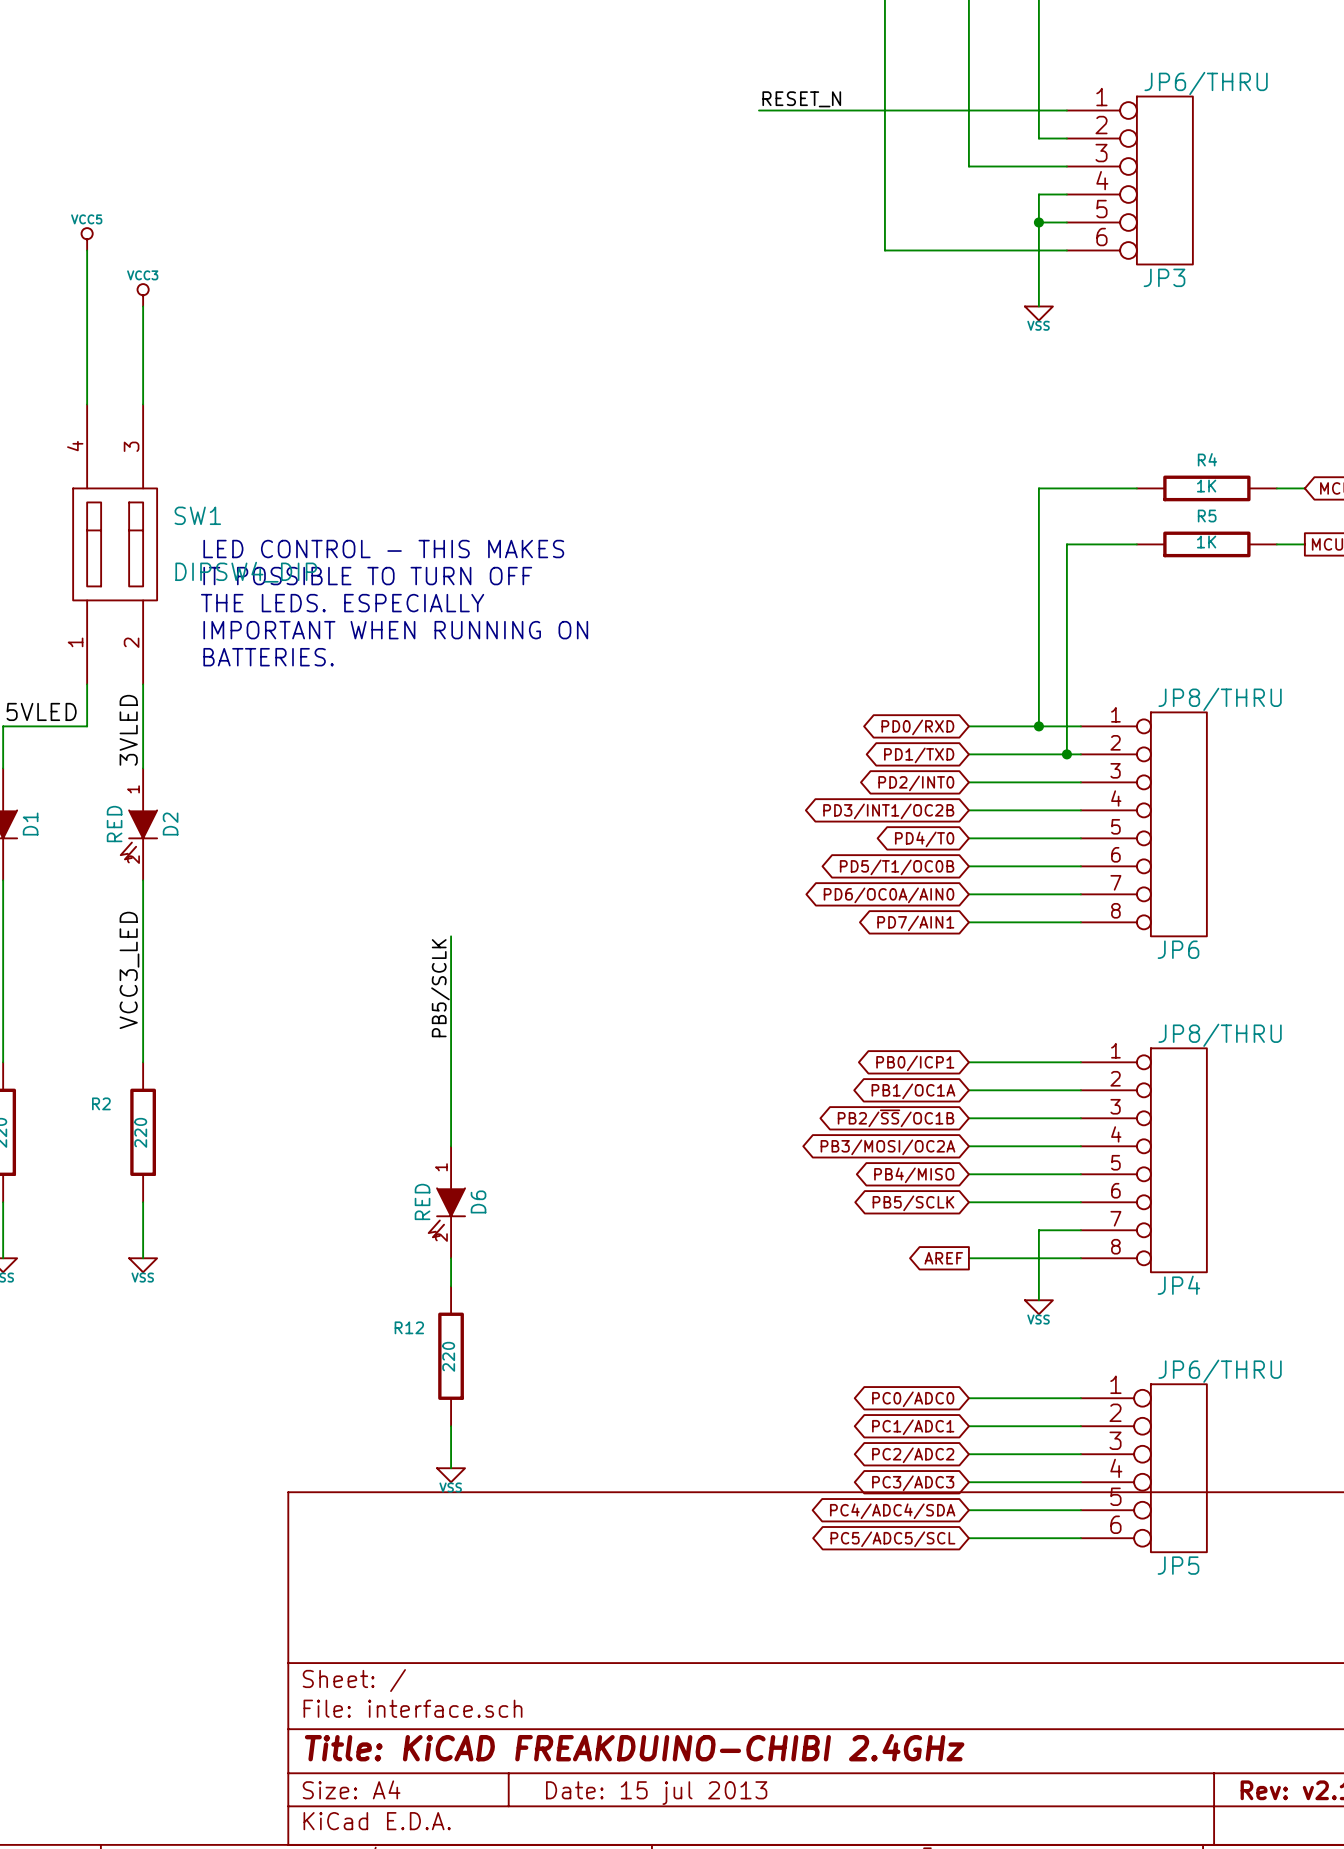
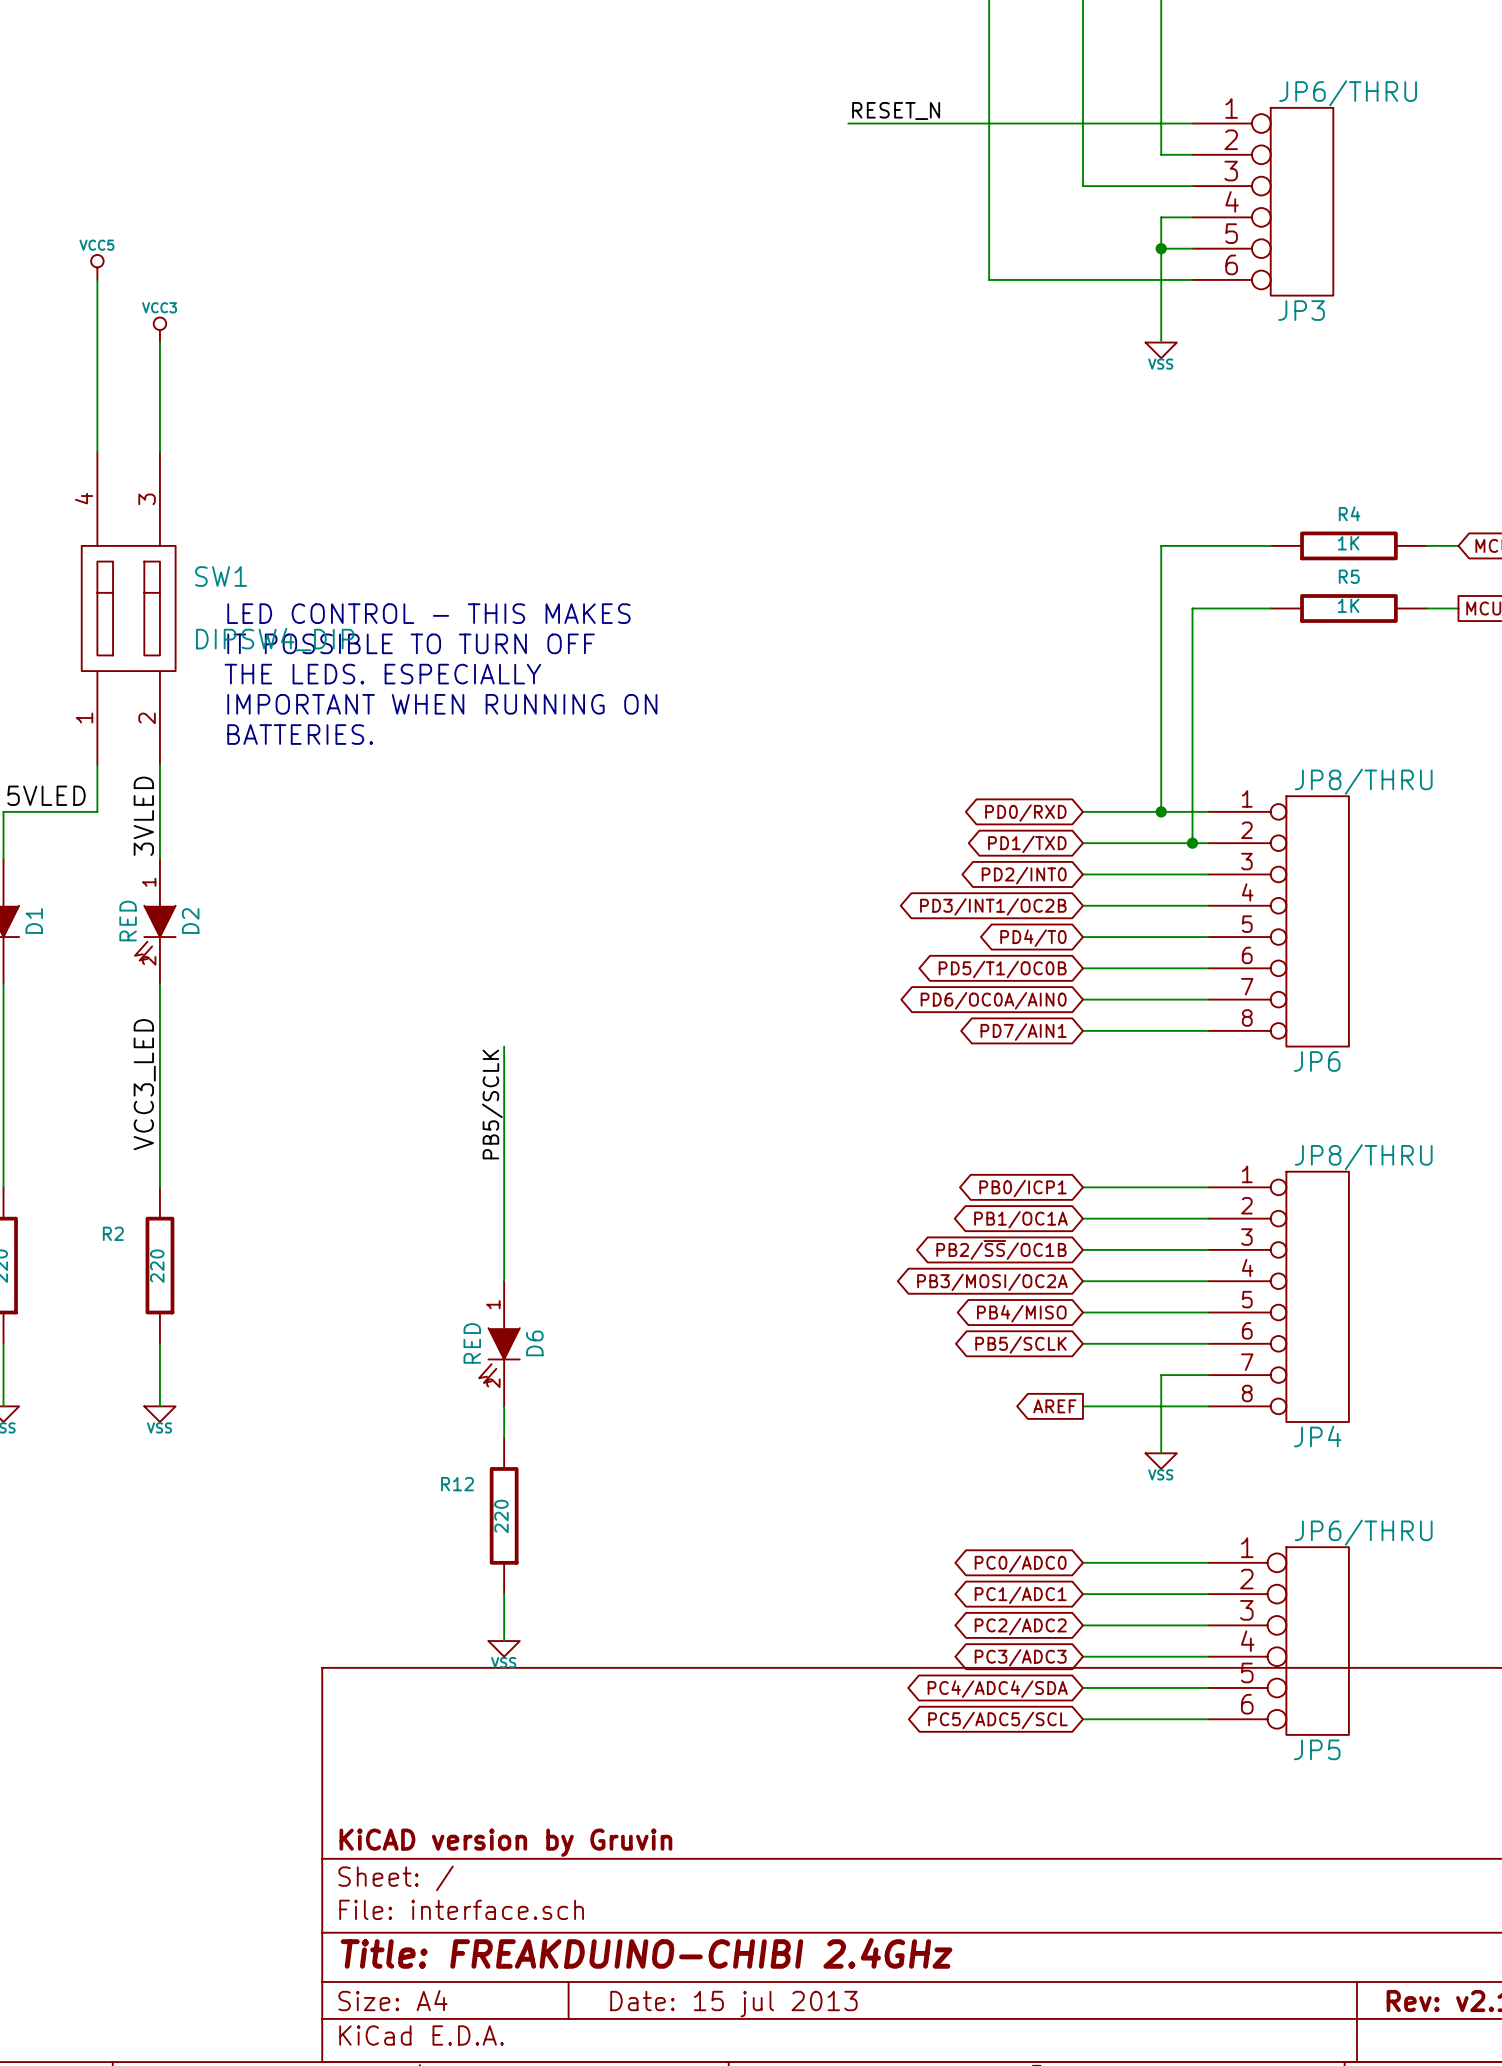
title block: none -> KiCAD version by Gruvin (505, 1842)
title block: Title: KiCAD FREAKDUINO-CHIBI 2.4GHz (634, 1747) -> Title: FREAKDUINO-CHIBI 2.4GHz (646, 1953)

